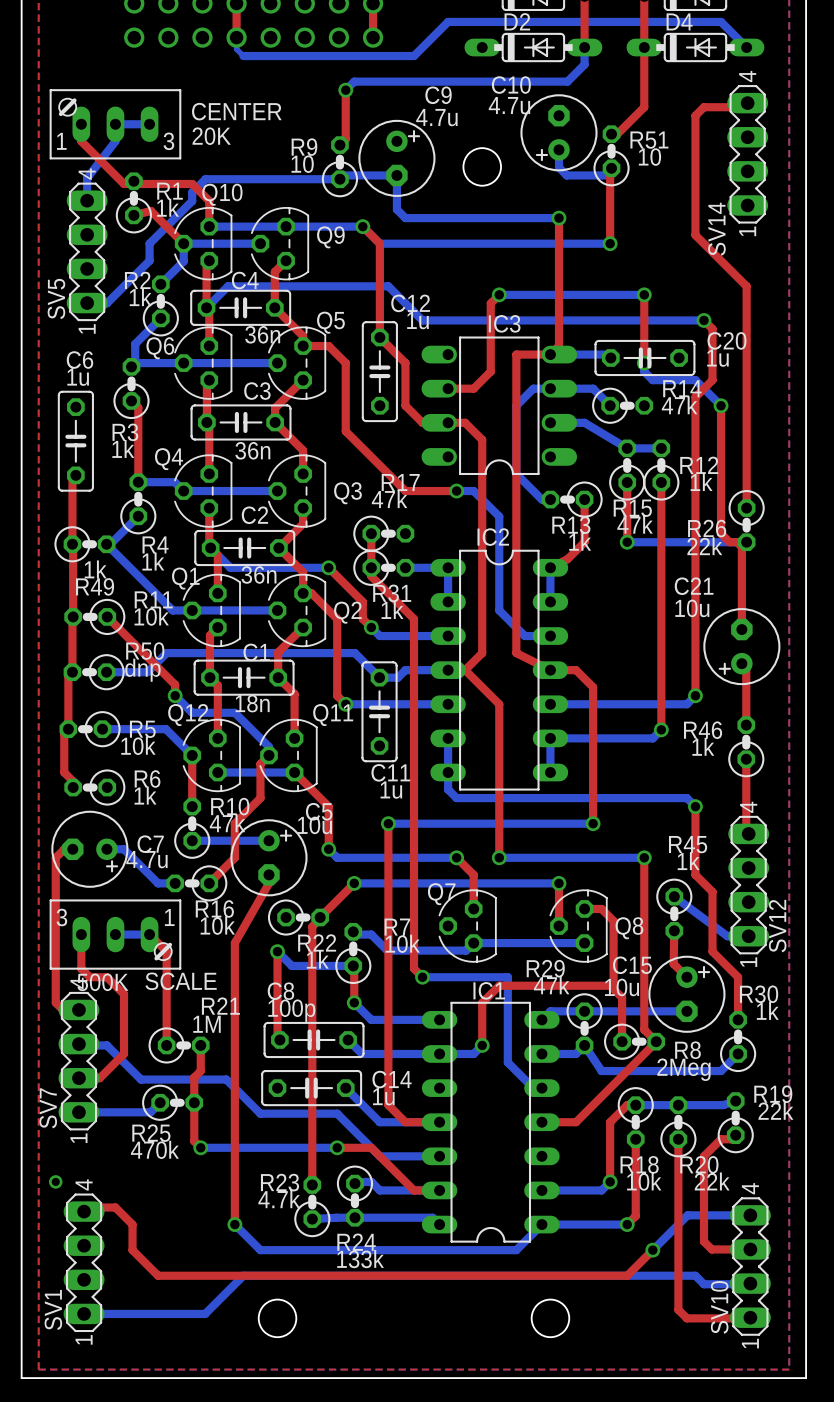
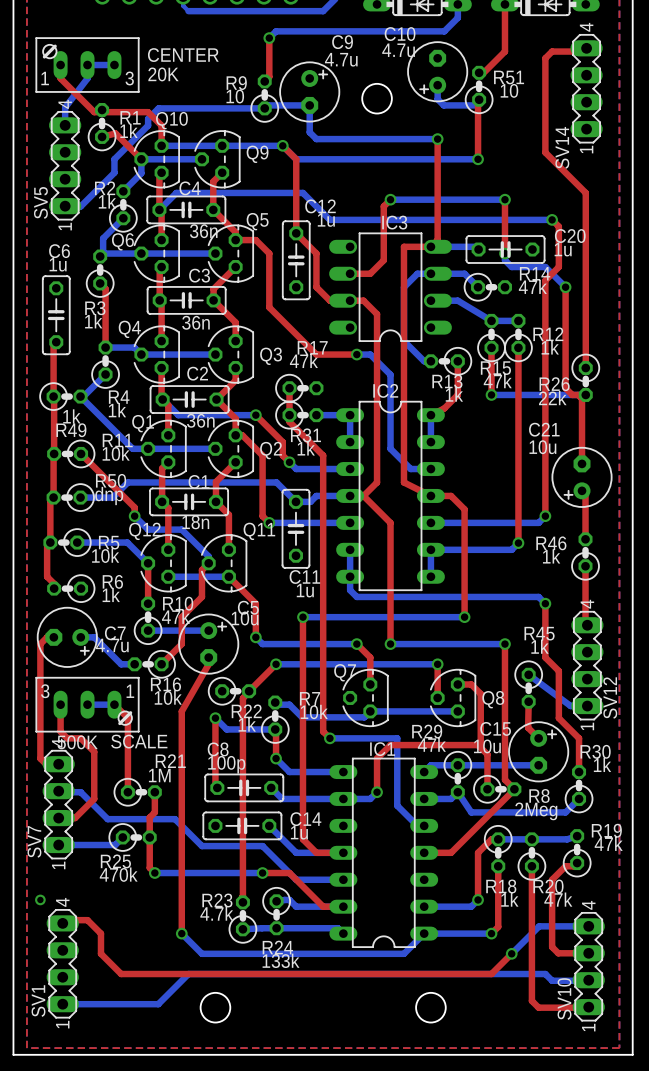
R19 value: 22k (775, 1110) -> 47k (608, 843)
R18 value: 10k (644, 1181) -> 1k (509, 899)
R20 value: 22k (712, 1181) -> 47k (558, 899)

